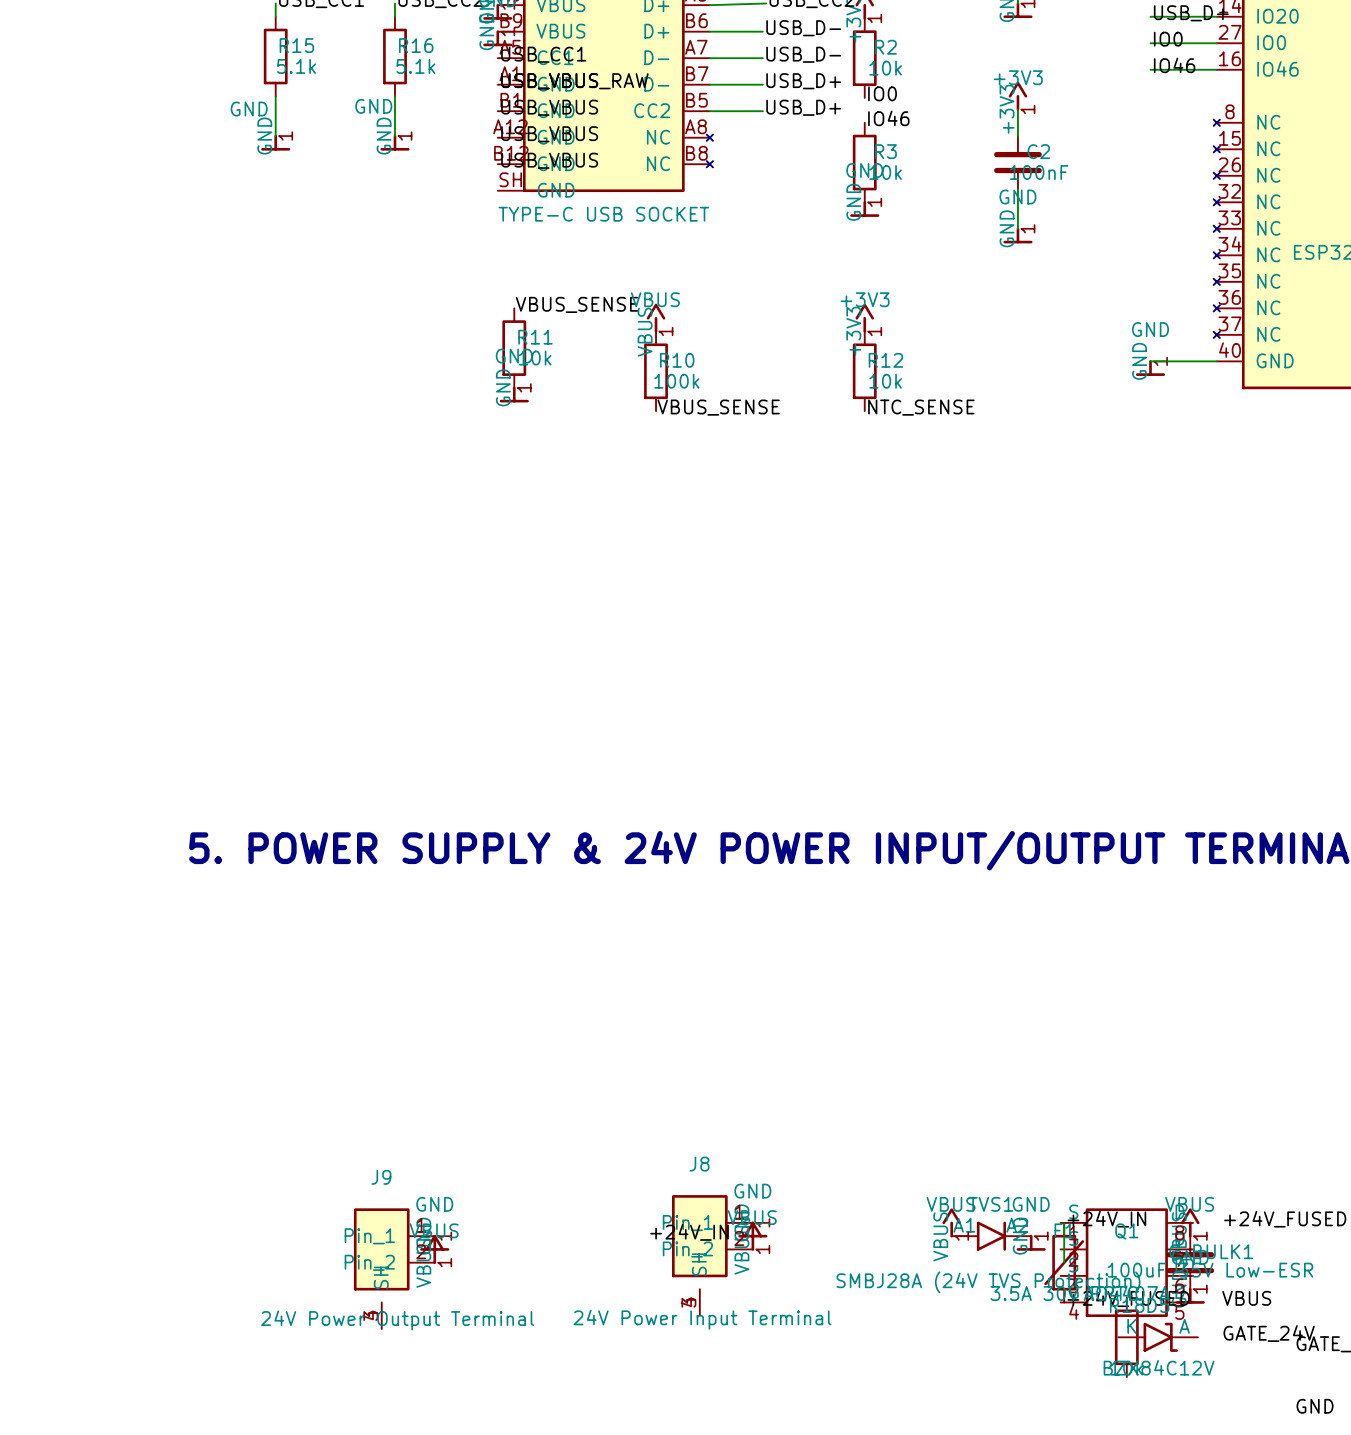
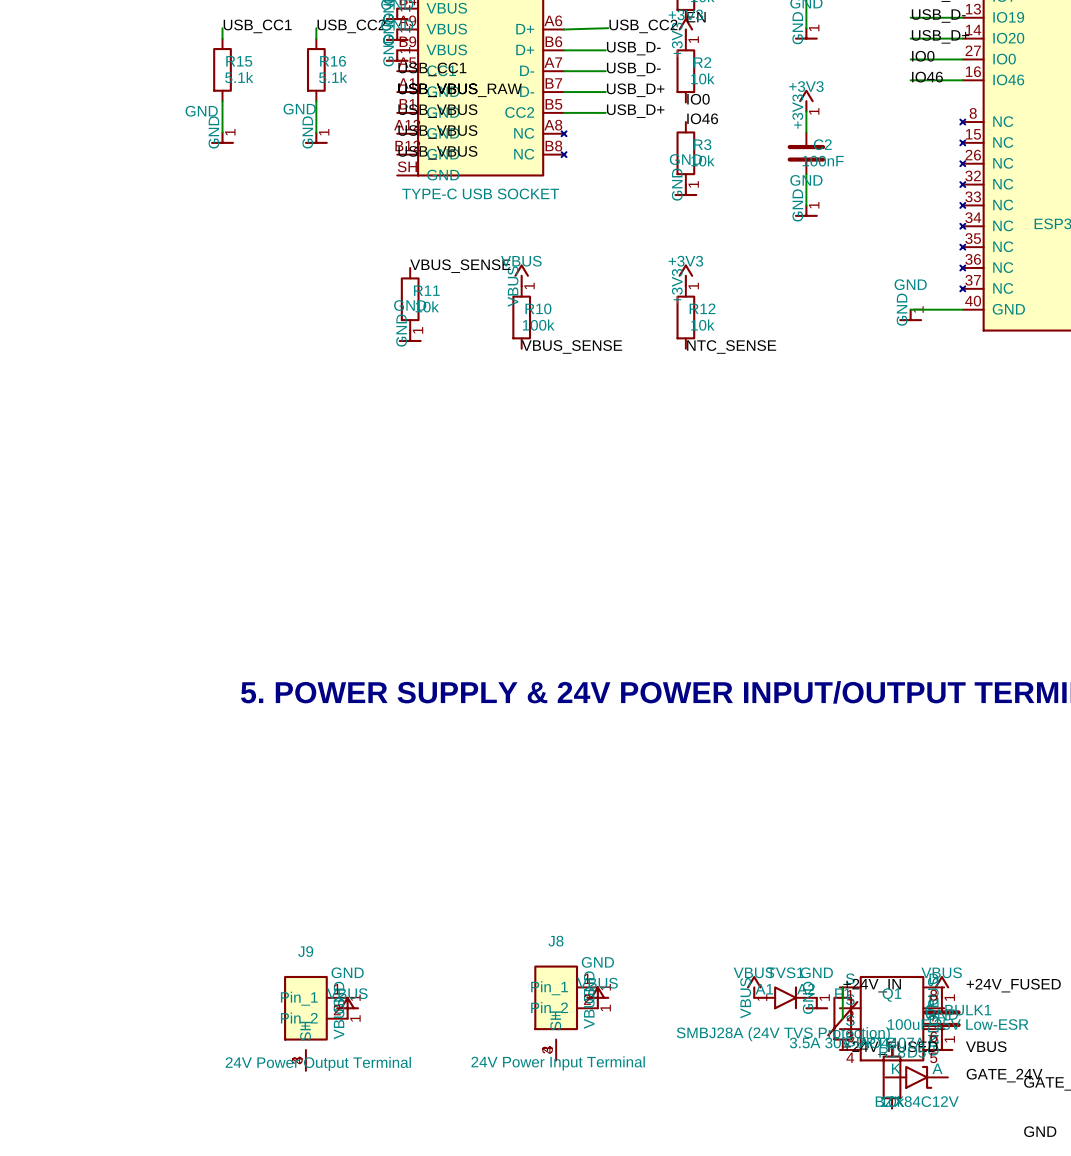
label: +24V_IN (689, 1232) -> none

